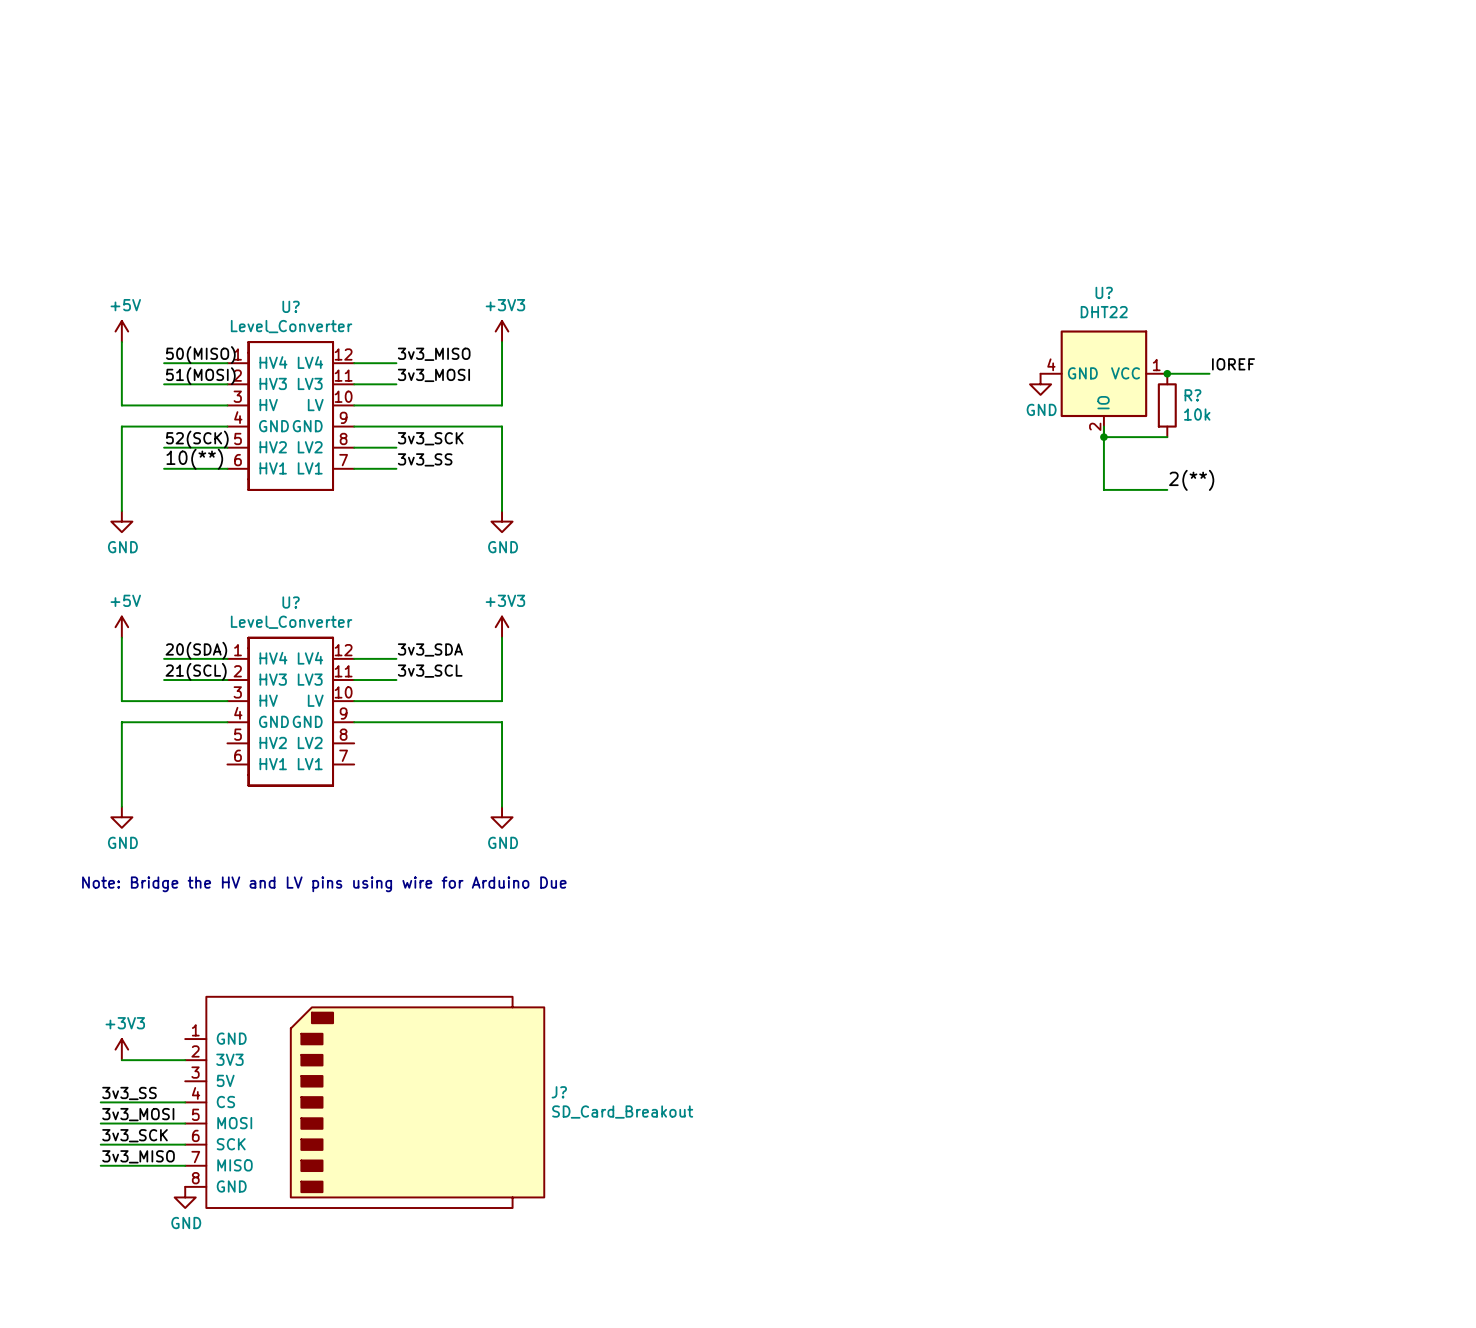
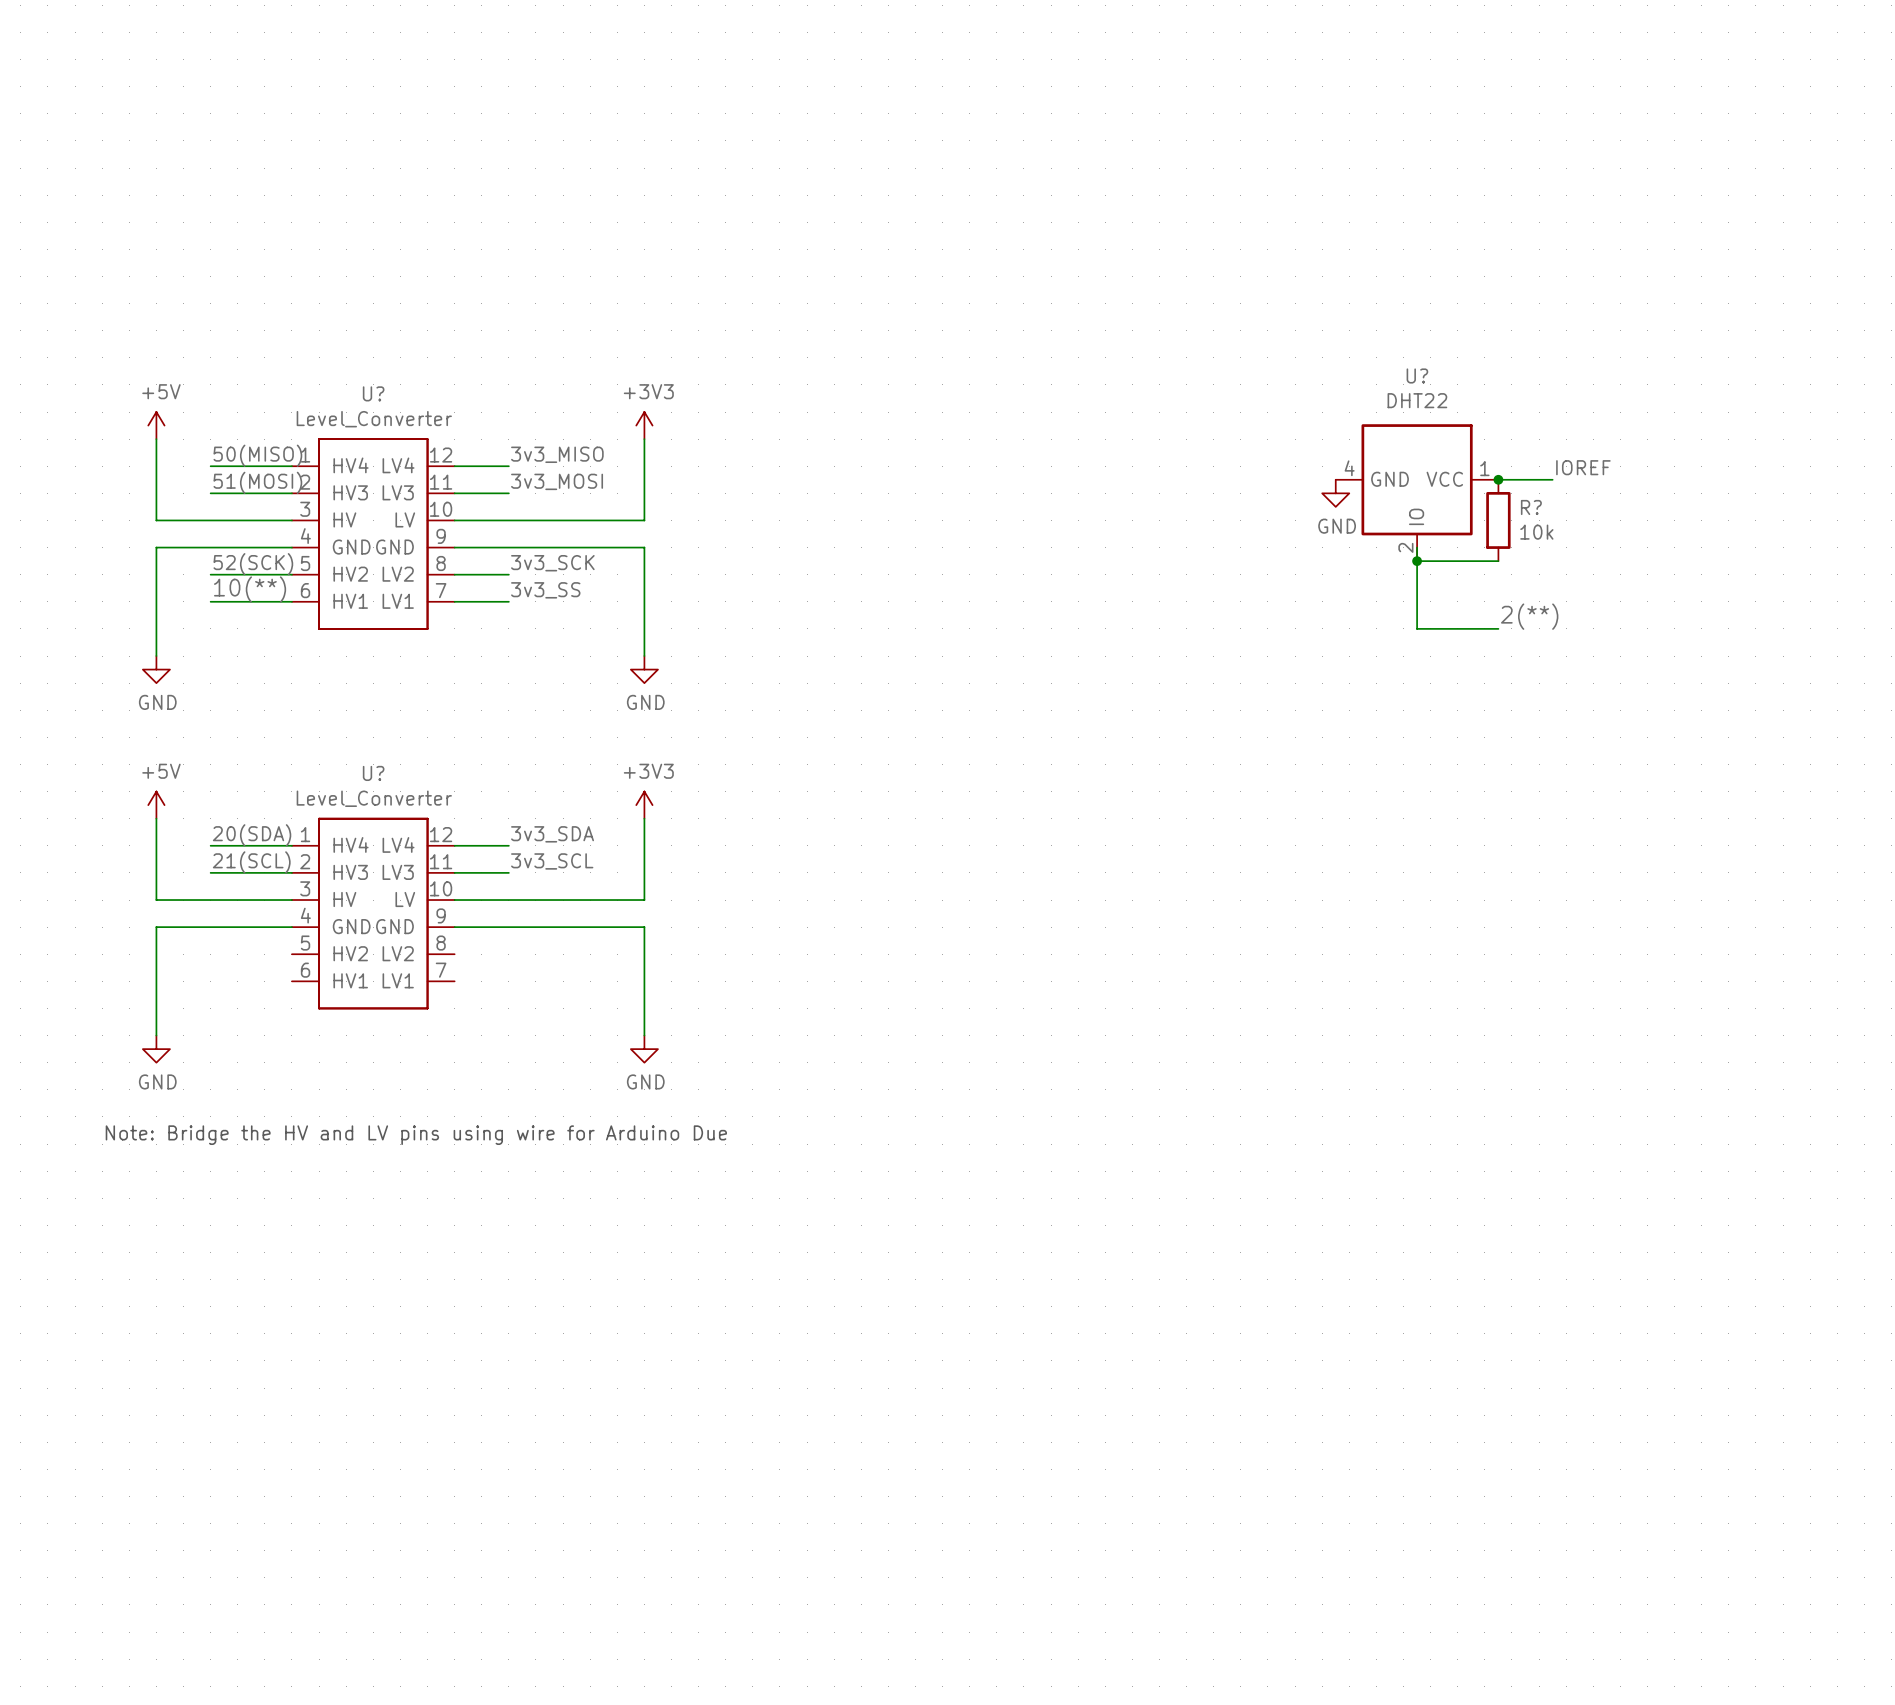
power symbol: +3V3 (121, 1049) -> none
wire: (121, 1060) (185, 1060) -> none
label: 3v3_SS (129, 1093) -> none
wire: (100, 1102) (185, 1102) -> none
J?: SD_Card_Breakout (364, 1102) -> none
label: 3v3_MOSI (138, 1114) -> none
wire: (100, 1123) (185, 1123) -> none
label: 3v3_SCK (135, 1135) -> none
wire: (100, 1144) (185, 1144) -> none
label: 3v3_MISO (138, 1156) -> none
wire: (100, 1165) (185, 1165) -> none
power symbol: GND (185, 1197) -> none

